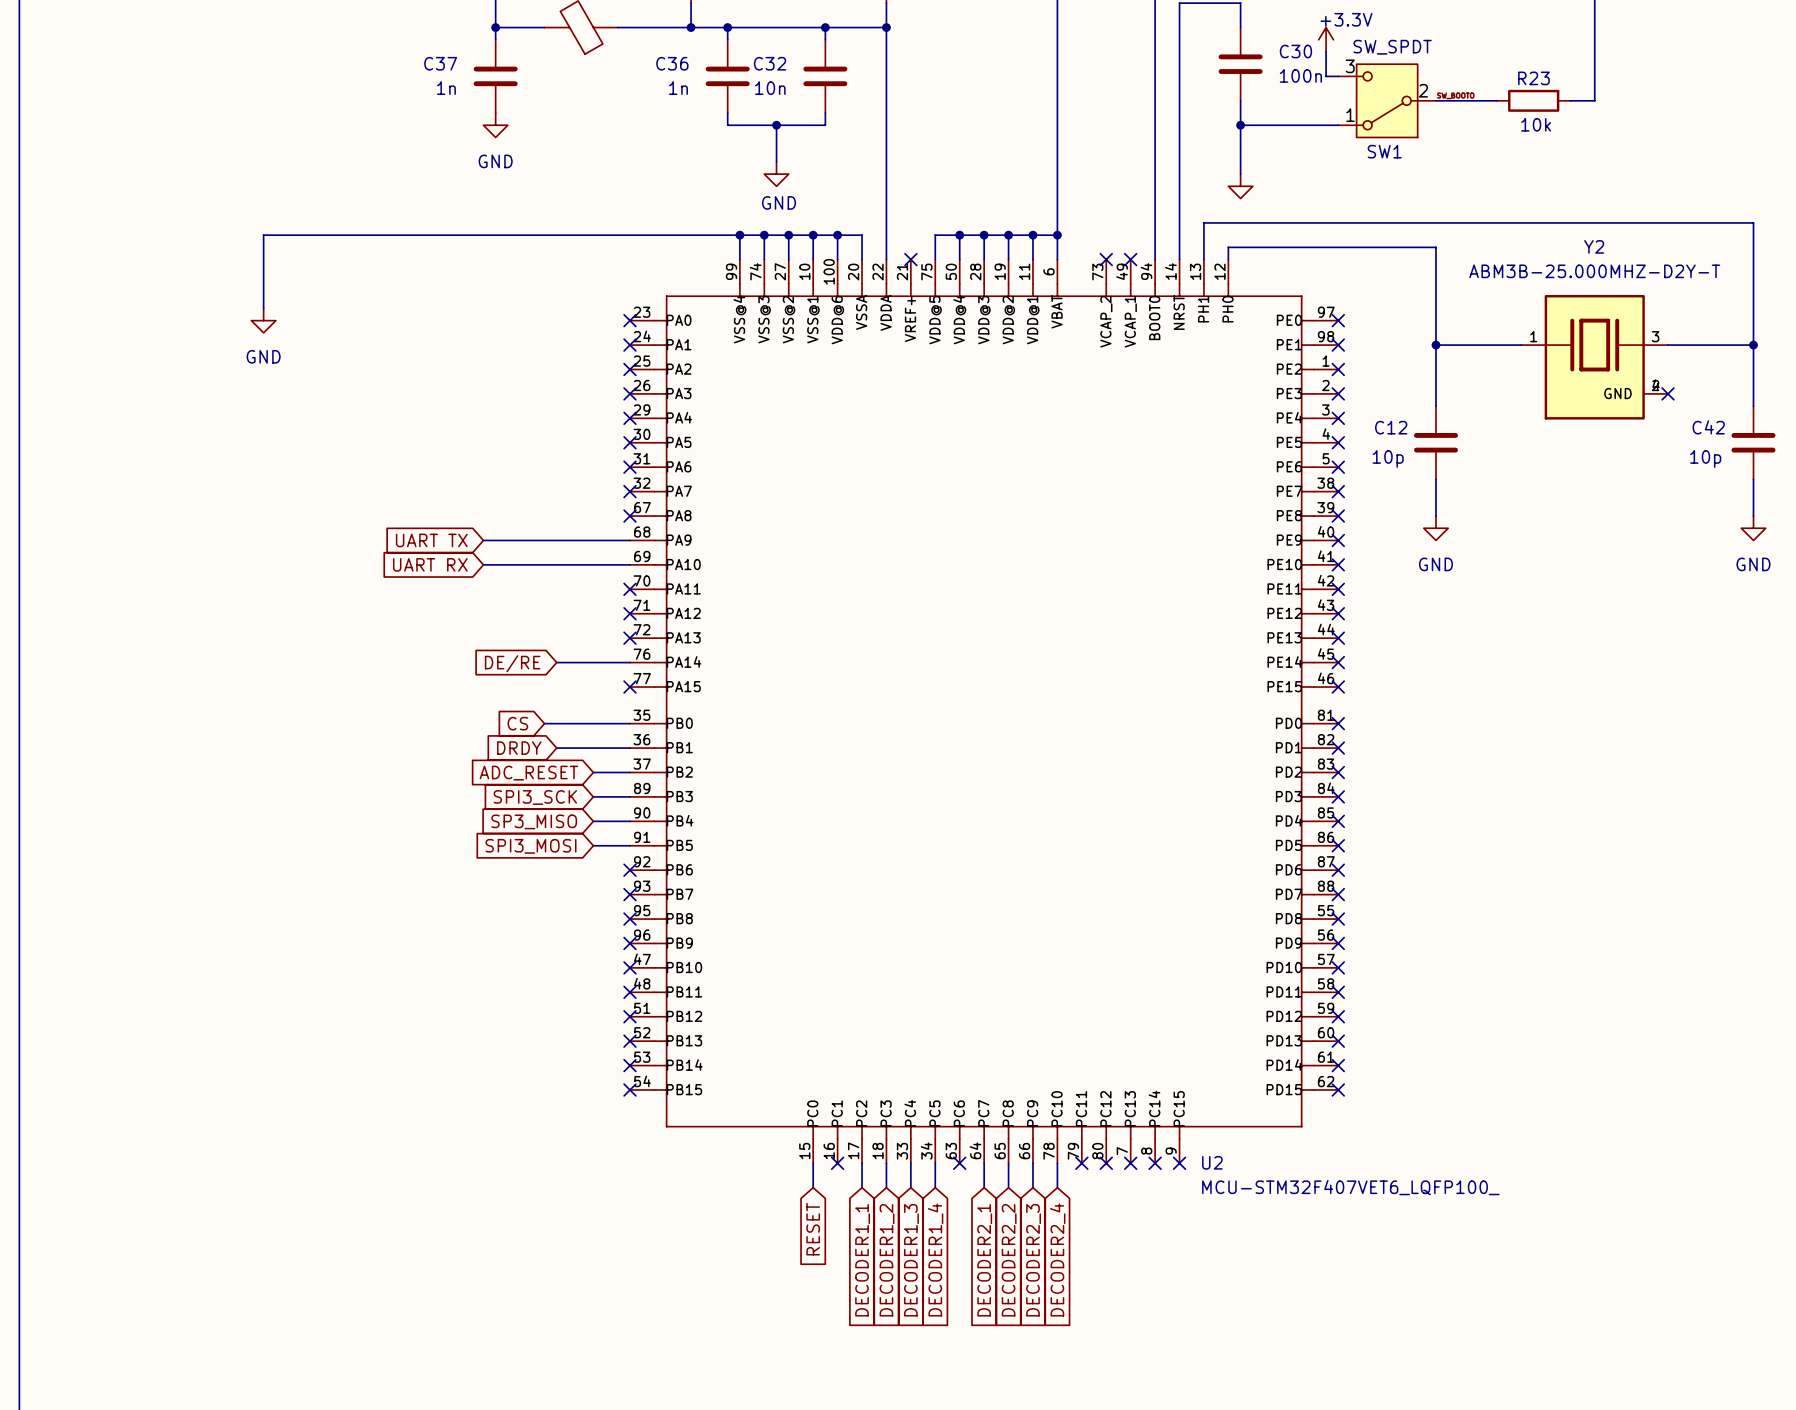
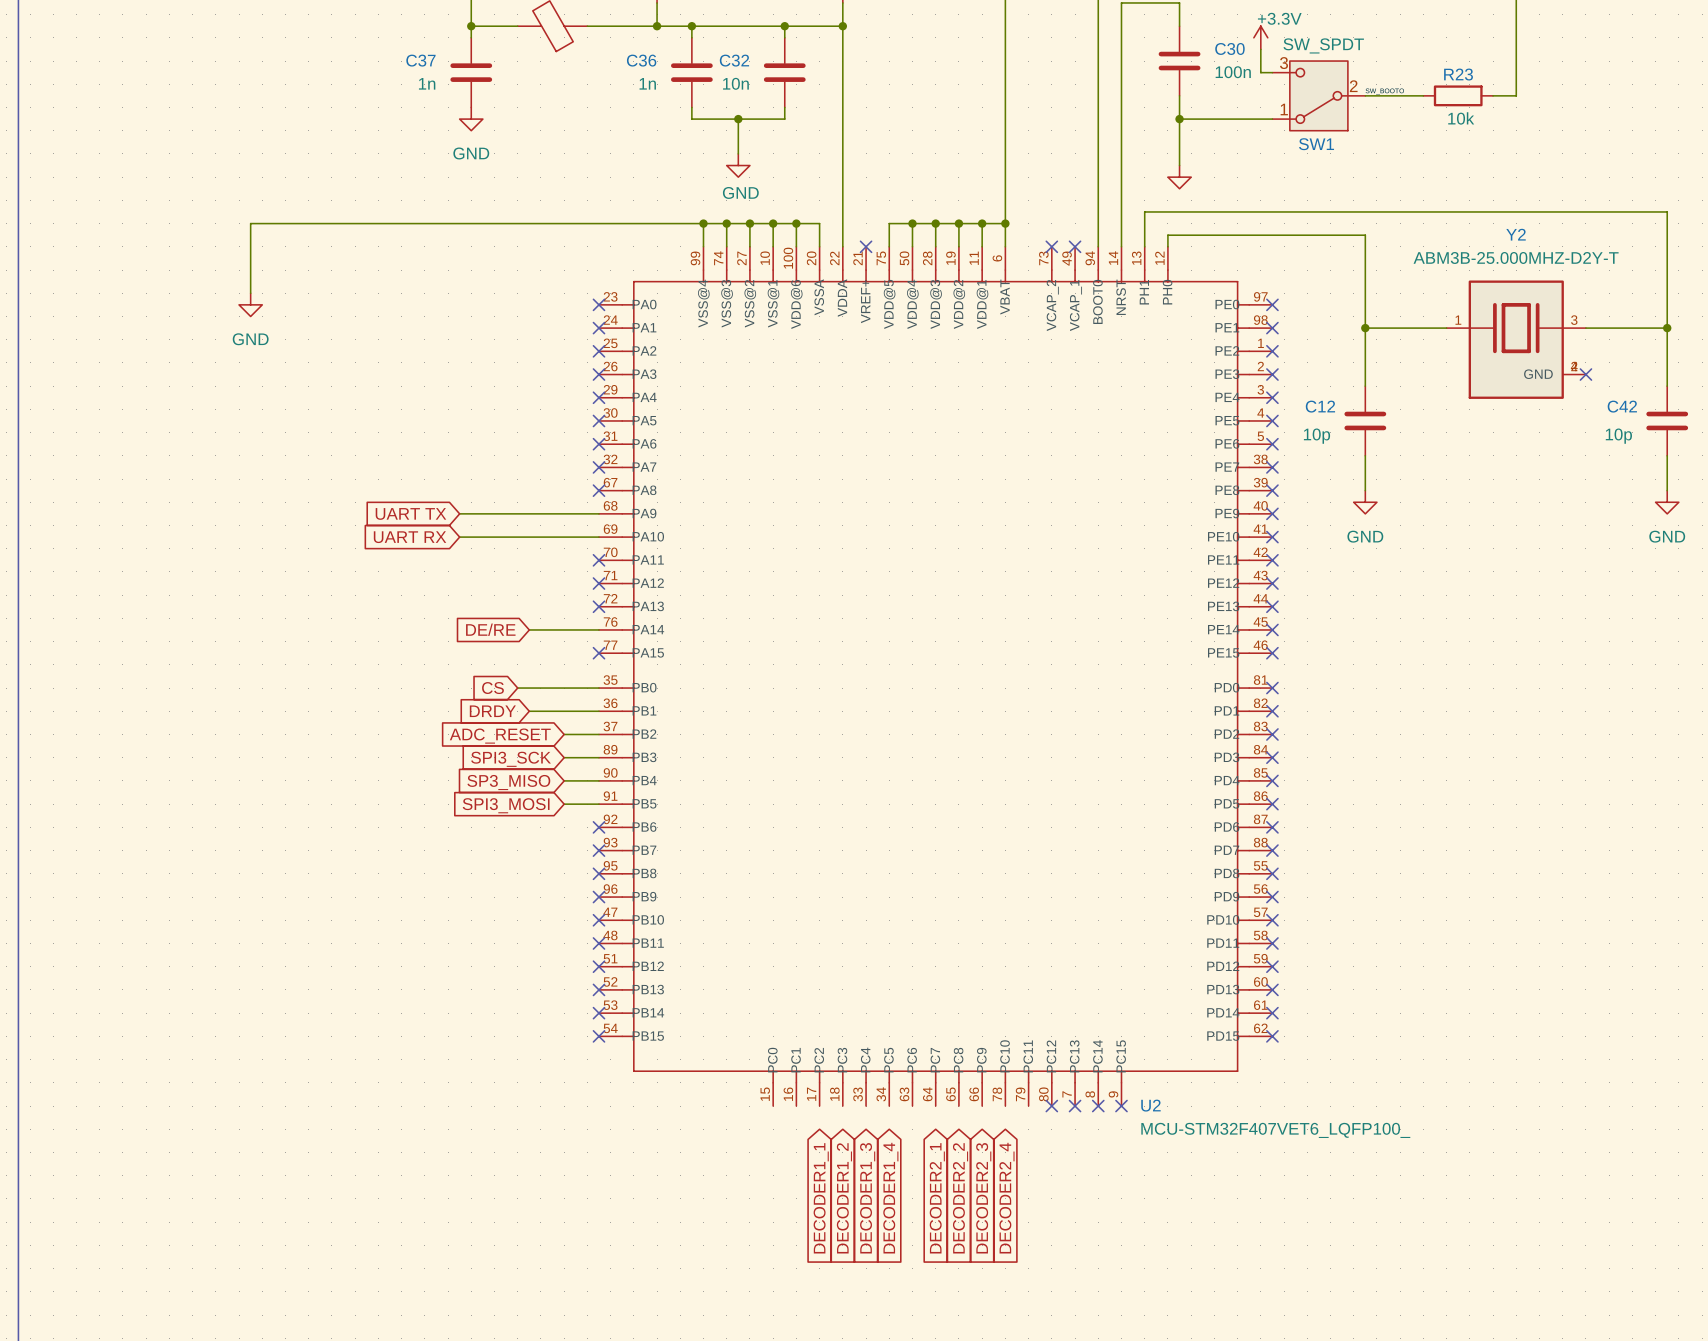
wire: (813, 1163) (813, 1187) -> none
no-connect mark: (837, 1163) -> none
wire: (862, 1163) (862, 1187) -> none
wire: (886, 1163) (886, 1187) -> none
wire: (910, 1163) (910, 1187) -> none
wire: (935, 1163) (935, 1187) -> none
no-connect mark: (959, 1163) -> none
wire: (984, 1163) (984, 1187) -> none
wire: (1008, 1163) (1008, 1187) -> none
wire: (1032, 1163) (1032, 1187) -> none
wire: (1057, 1163) (1057, 1187) -> none
no-connect mark: (1081, 1163) -> none
global label: RESET (813, 1229) -> none

